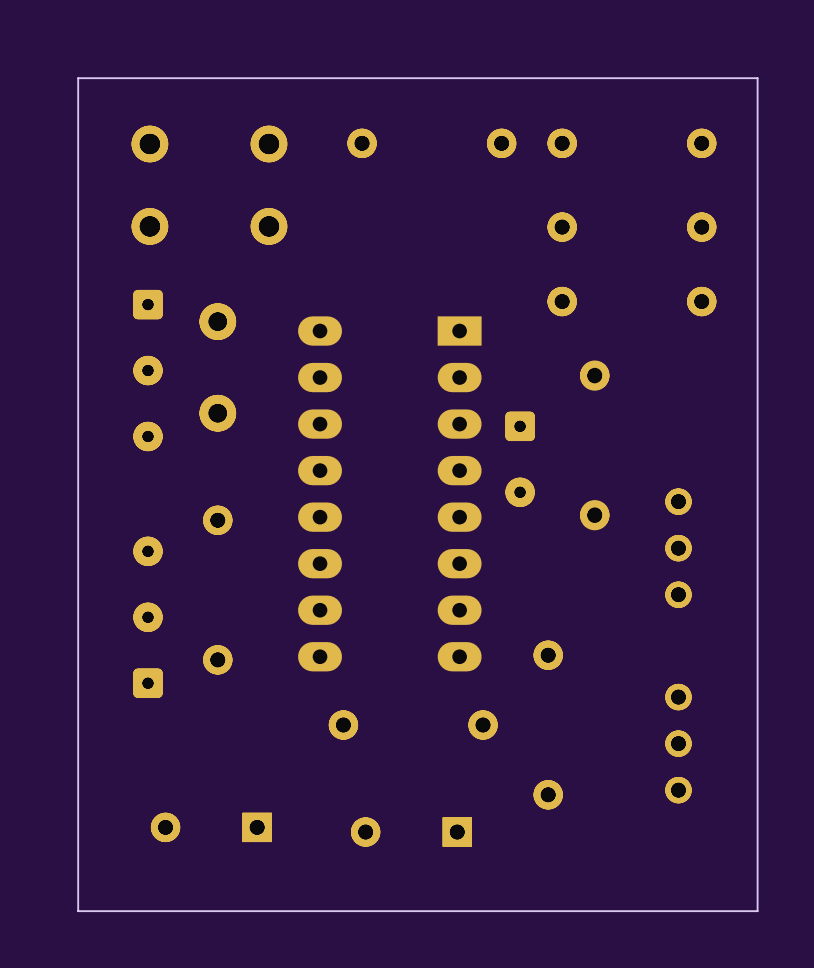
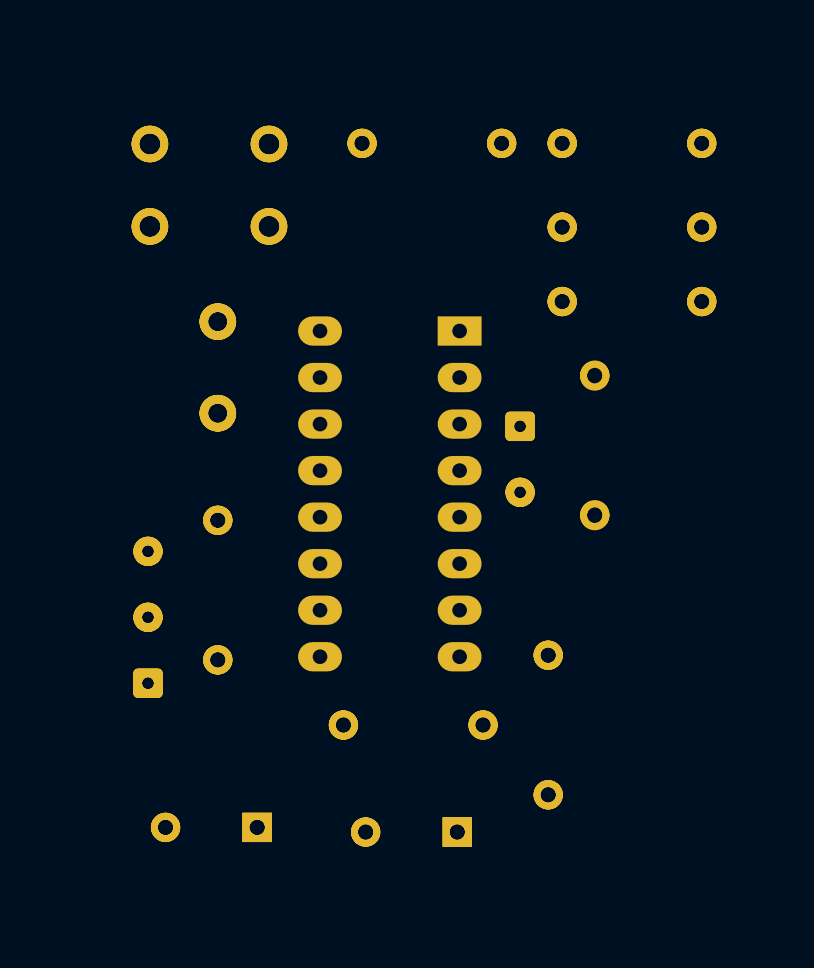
board edge: (757, 78) (78, 78) (78, 911) (757, 911) (757, 78) -> none
part: (147, 370) -> none
part: (678, 548) -> none
part: (678, 743) -> none

